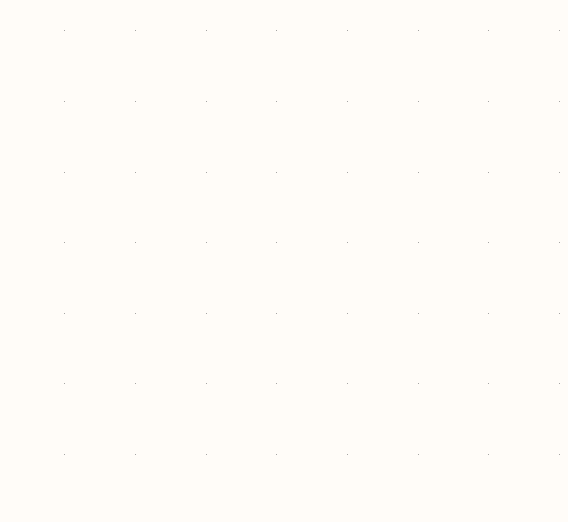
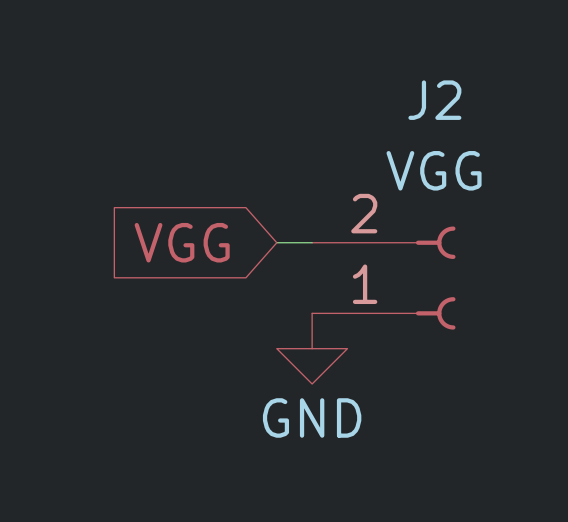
global label: none -> VGG (182, 242)
wire: none -> (276, 242) (312, 242)
J2: none -> VGG (383, 278)
power symbol: none -> GND (312, 348)

